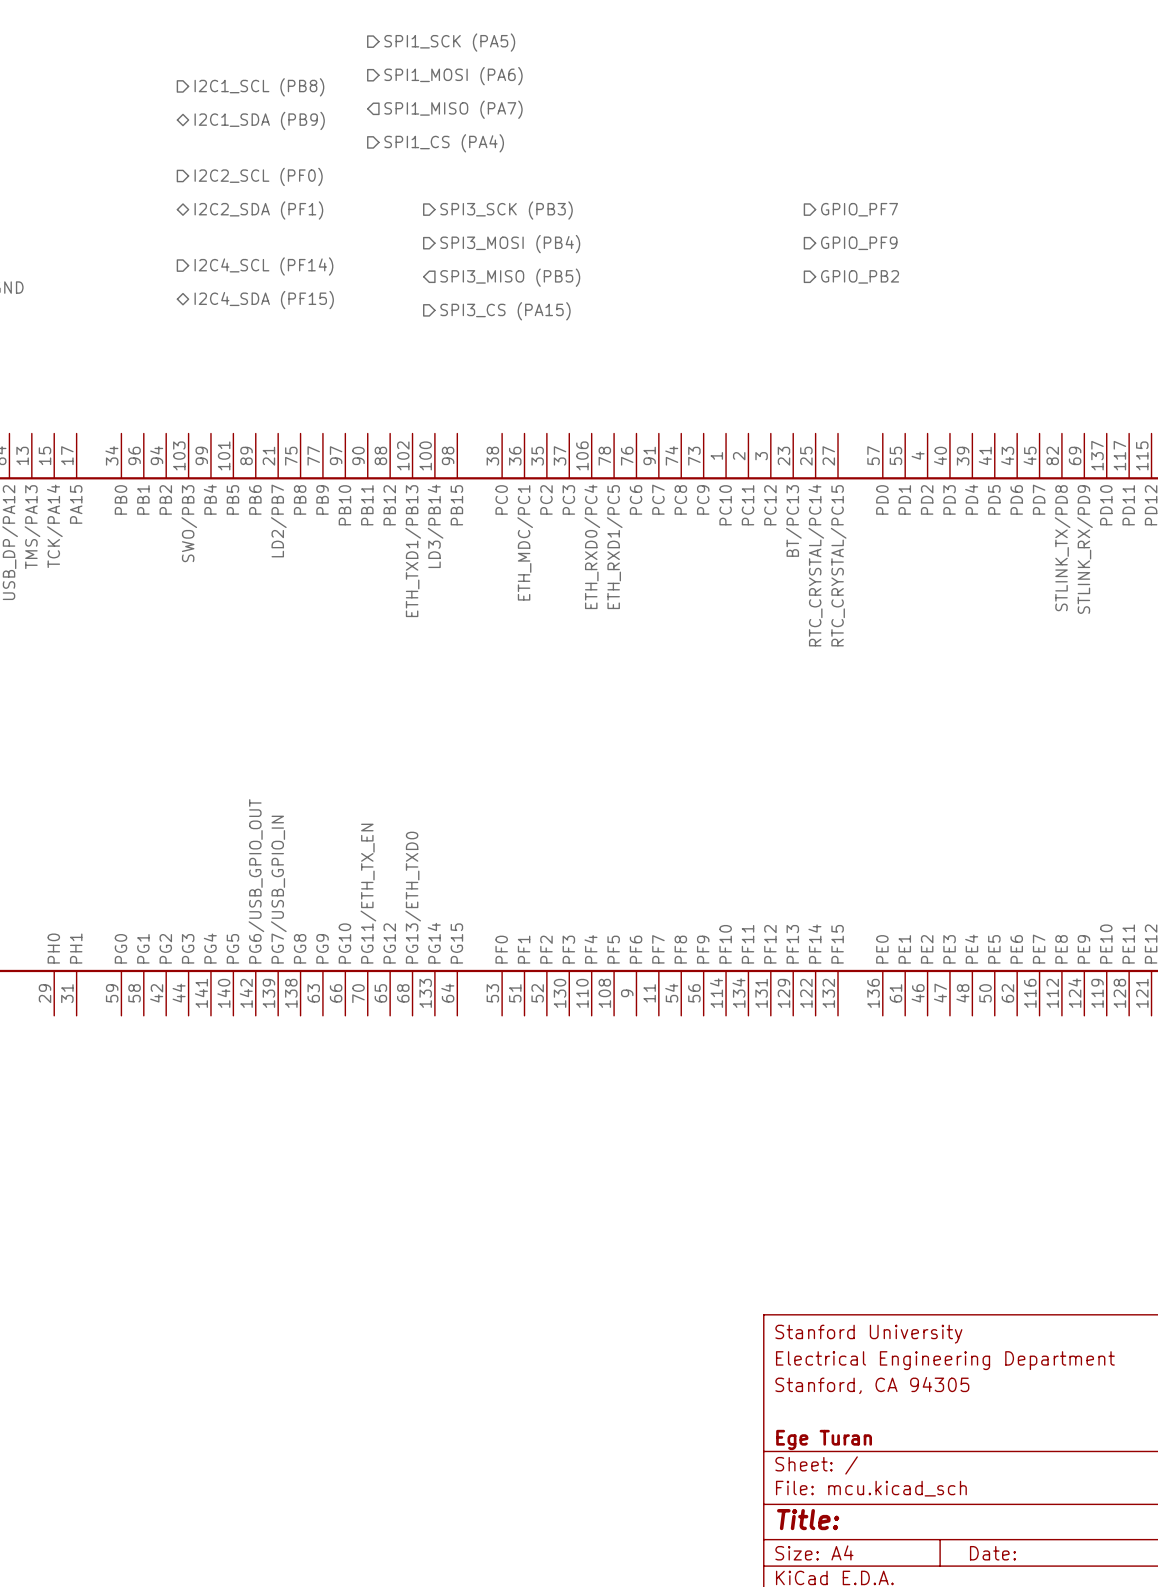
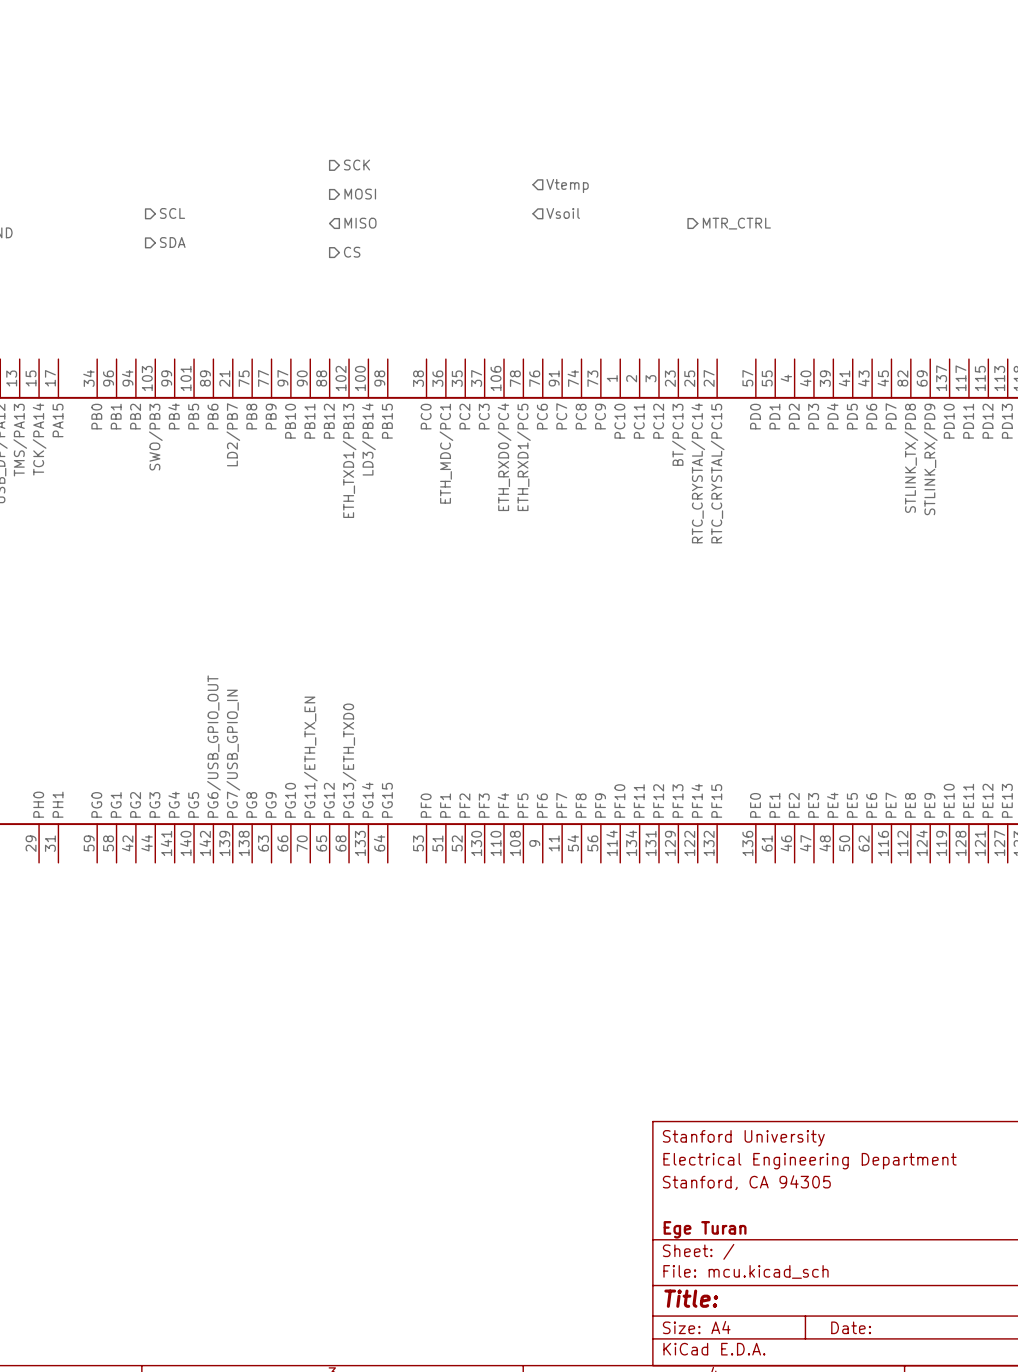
hierarchical label: SPI1_SCK (PA5) (449, 42) -> none
hierarchical label: SPI1_MOSI (PA6) (453, 76) -> none
hierarchical label: I2C1_SCL (PB8) (259, 87) -> none
hierarchical label: SPI1_MISO (PA7) (453, 109) -> none
hierarchical label: I2C1_SDA (PB9) (259, 120) -> none
hierarchical label: SPI1_CS (PA4) (444, 143) -> none
hierarchical label: I2C2_SCL (PF0) (258, 176) -> none
hierarchical label: none -> SCK (357, 165)
hierarchical label: GPIO_PF7 (859, 209) -> none
hierarchical label: I2C2_SDA (PF1) (258, 210) -> none
hierarchical label: SPI3_SCK (PB3) (506, 210) -> none
hierarchical label: none -> Vtemp (567, 186)
hierarchical label: none -> MOSI (360, 194)
hierarchical label: GPIO_PF9 (859, 243) -> none
hierarchical label: SPI3_MOSI (PB4) (510, 244) -> none
hierarchical label: none -> Vsoil (563, 213)
hierarchical label: I2C4_SCL (PF14) (263, 266) -> SCL (172, 213)
hierarchical label: none -> MISO (360, 223)
hierarchical label: GPIO_PB2 (860, 276) -> MTR_CTRL (736, 223)
hierarchical label: SPI3_MISO (PB5) (510, 277) -> none
hierarchical label shape: bidirectional (264, 300) -> output (172, 242)
hierarchical label: I2C4_SDA (PF15) (264, 300) -> SDA (172, 242)
hierarchical label: none -> CS (352, 252)
hierarchical label: SPI3_CS (PA15) (505, 311) -> none

